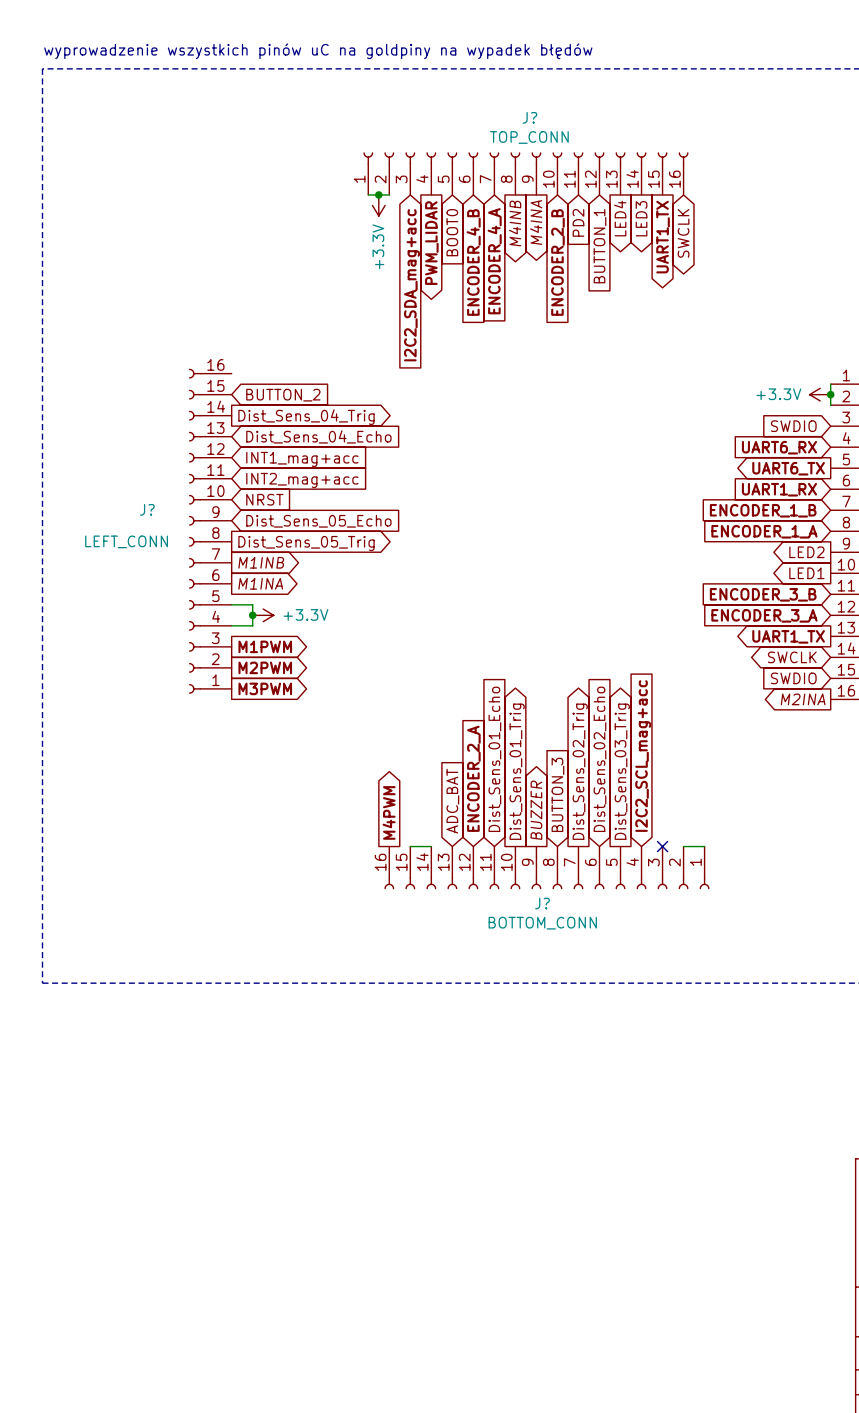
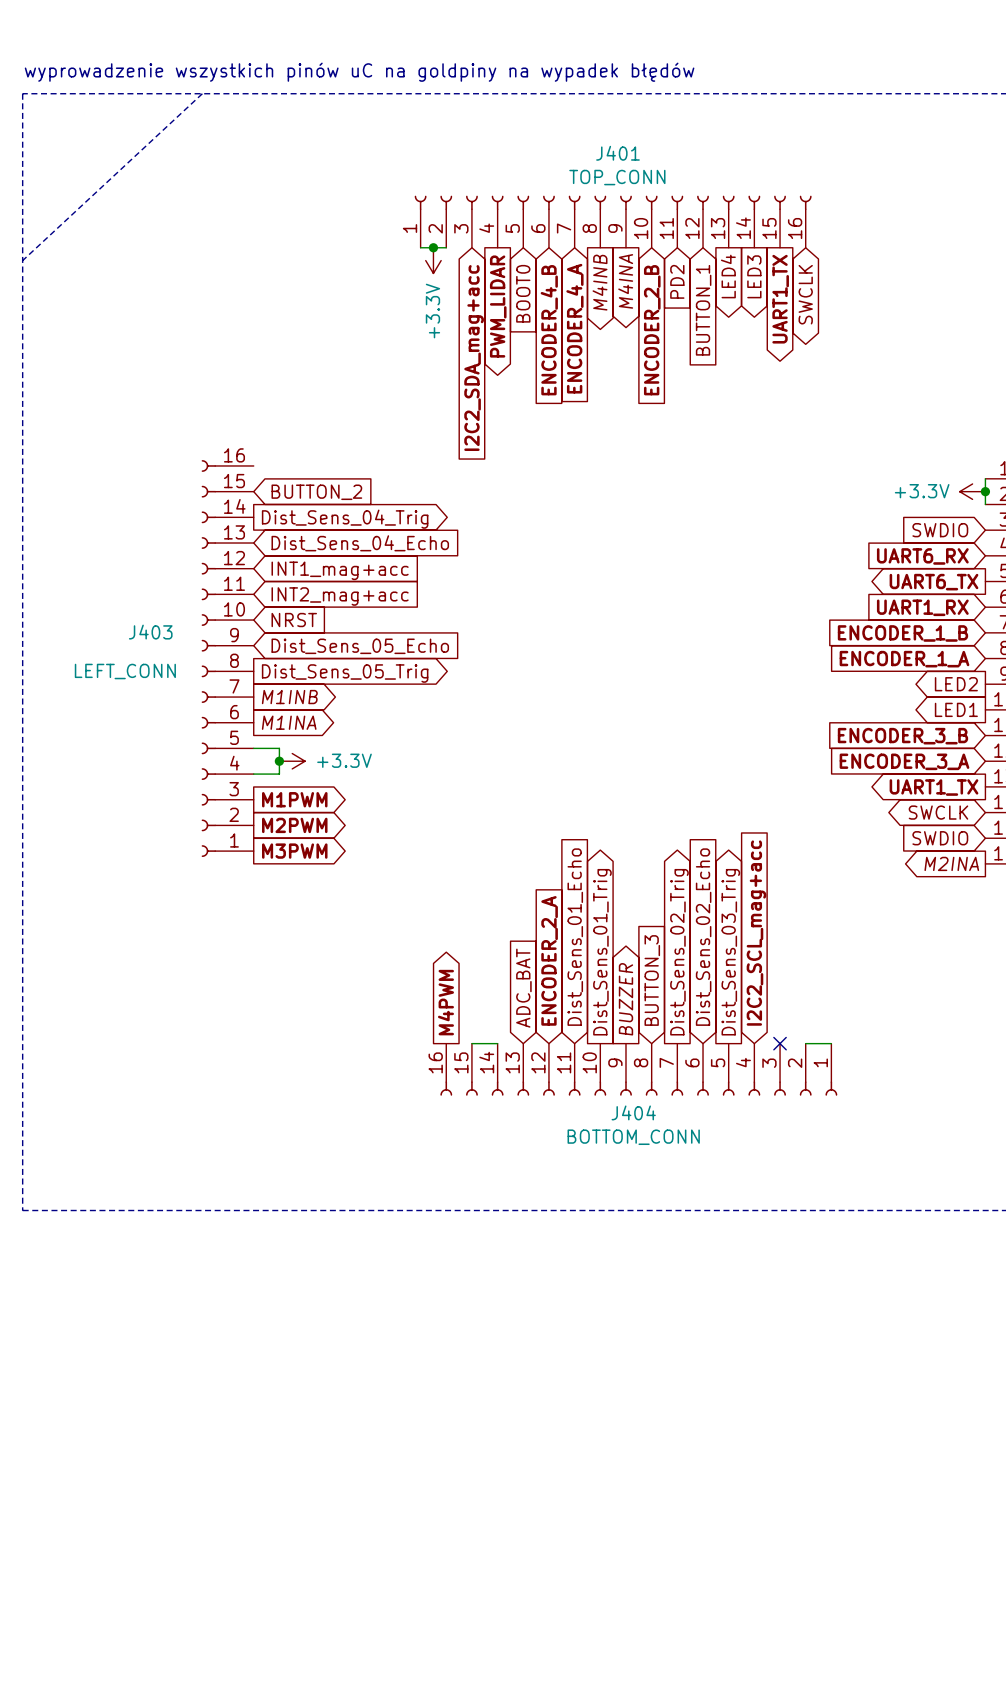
line: none -> (202, 93) (22, 260)
J? name: J? (529, 117) -> J401 (617, 153)
J? name: J? (147, 509) -> J403 (150, 632)
J? name: J? (542, 903) -> J404 (633, 1112)

